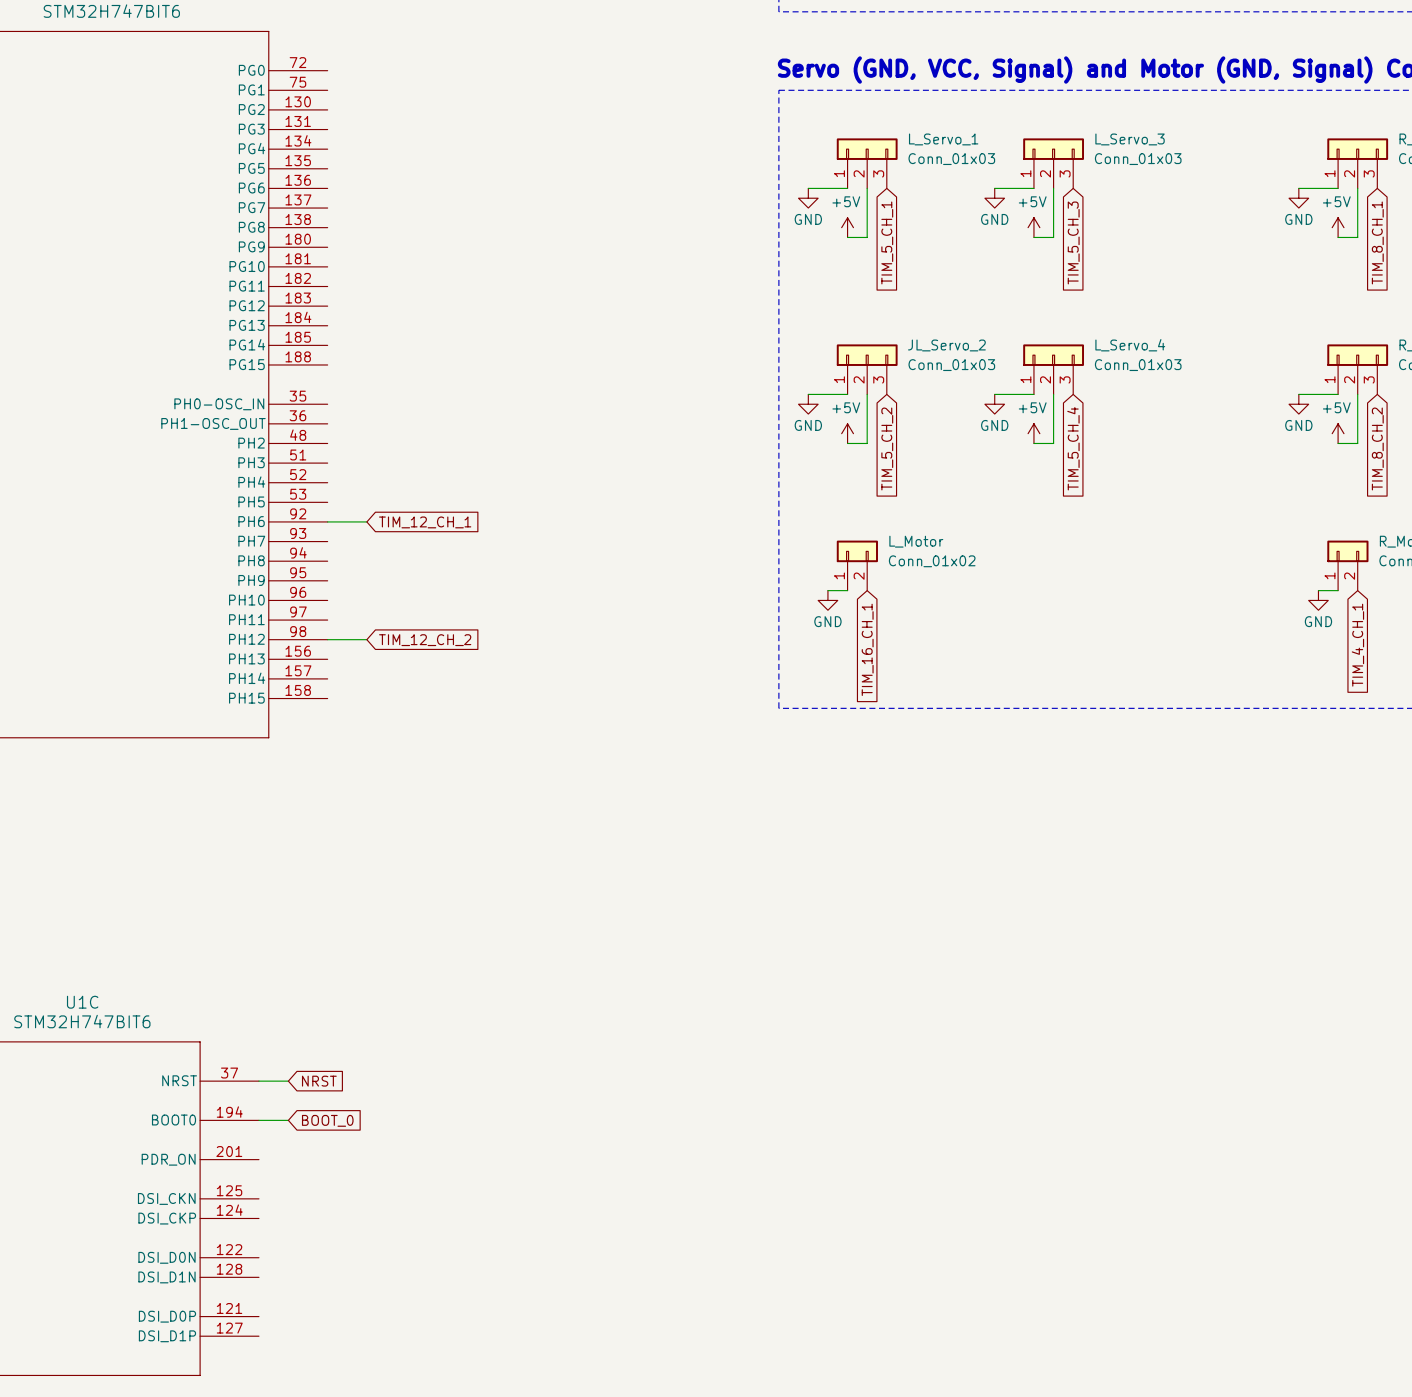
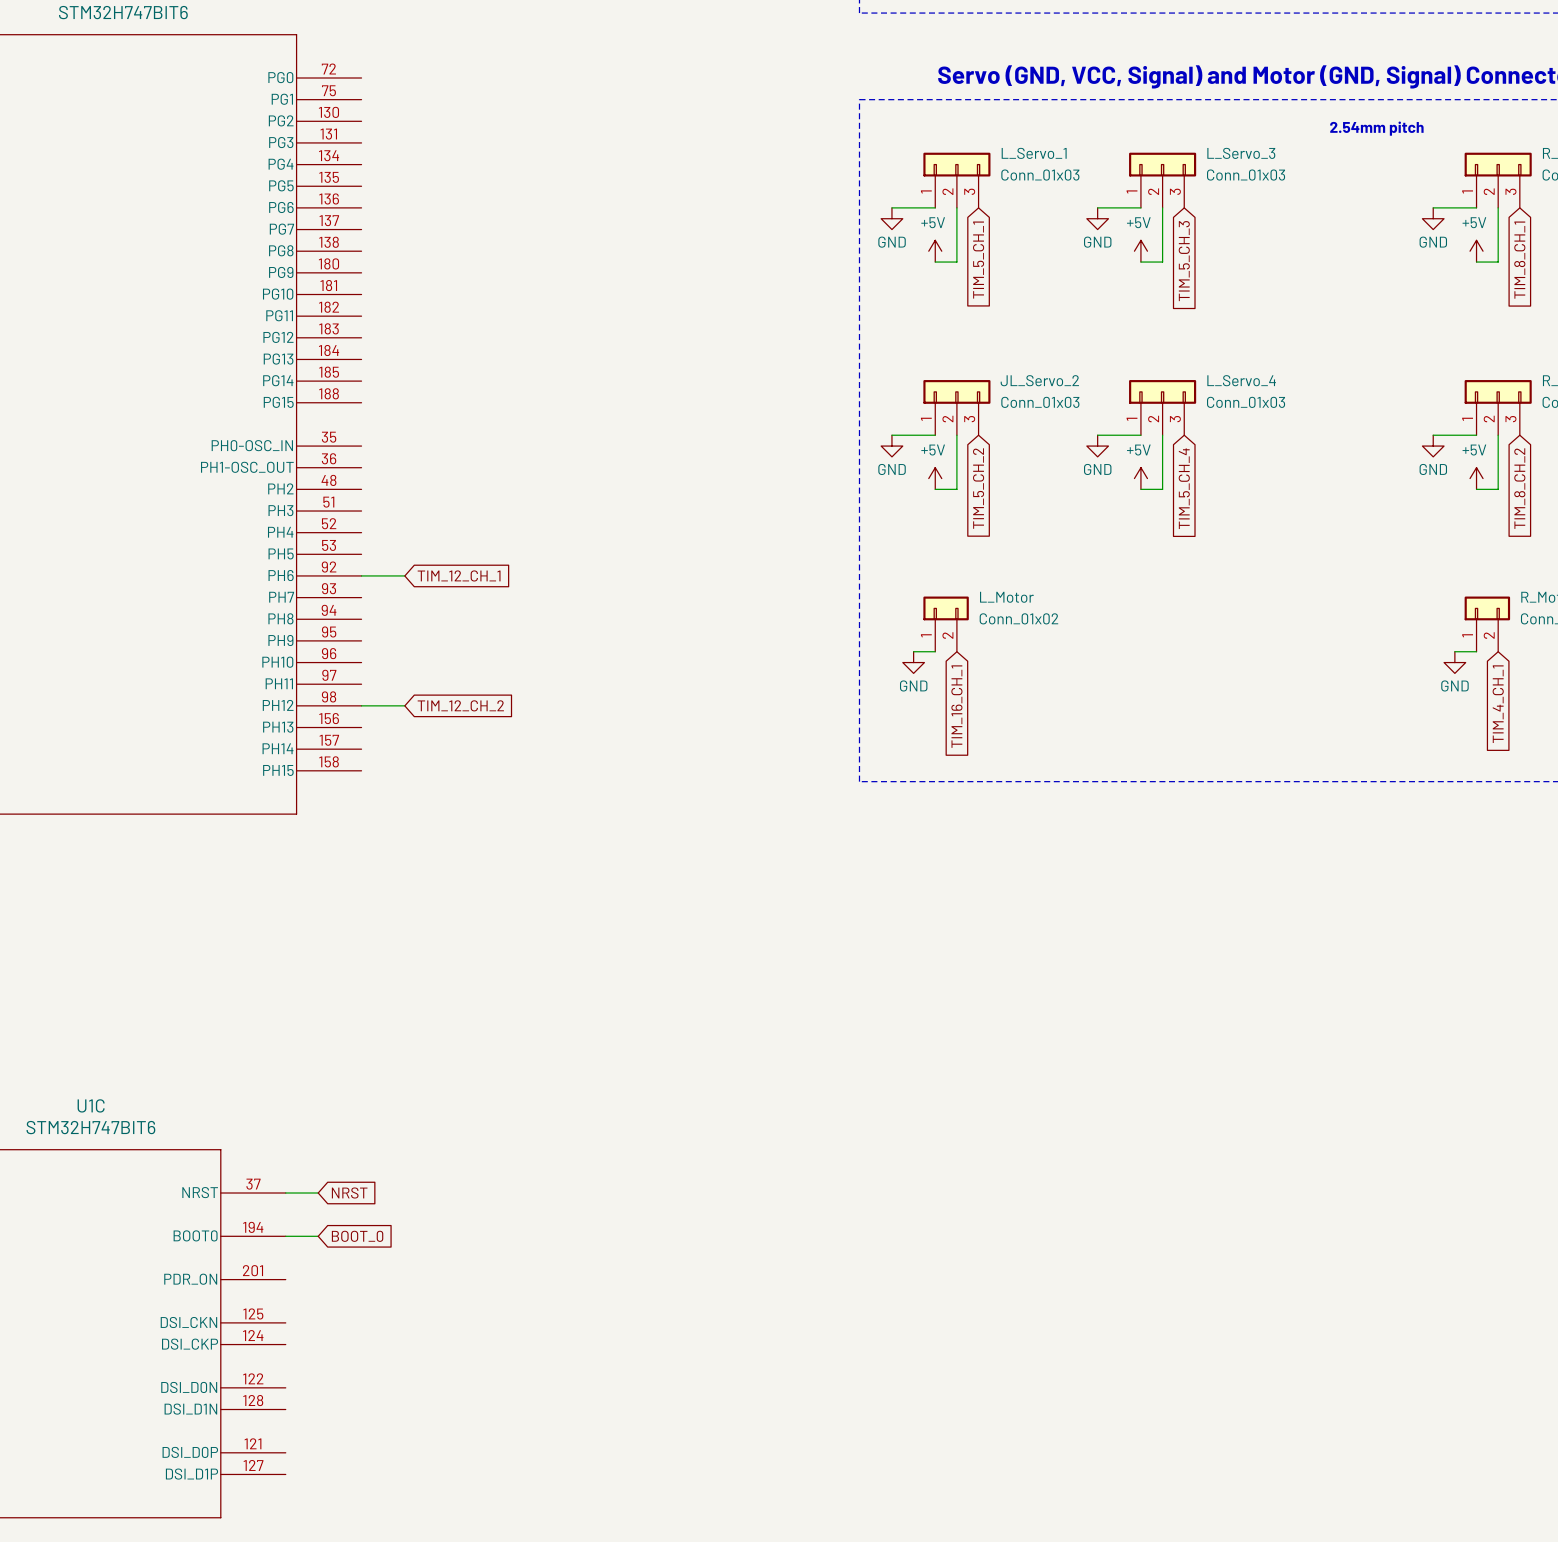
text: none -> 2.54mm pitch (1376, 128)

